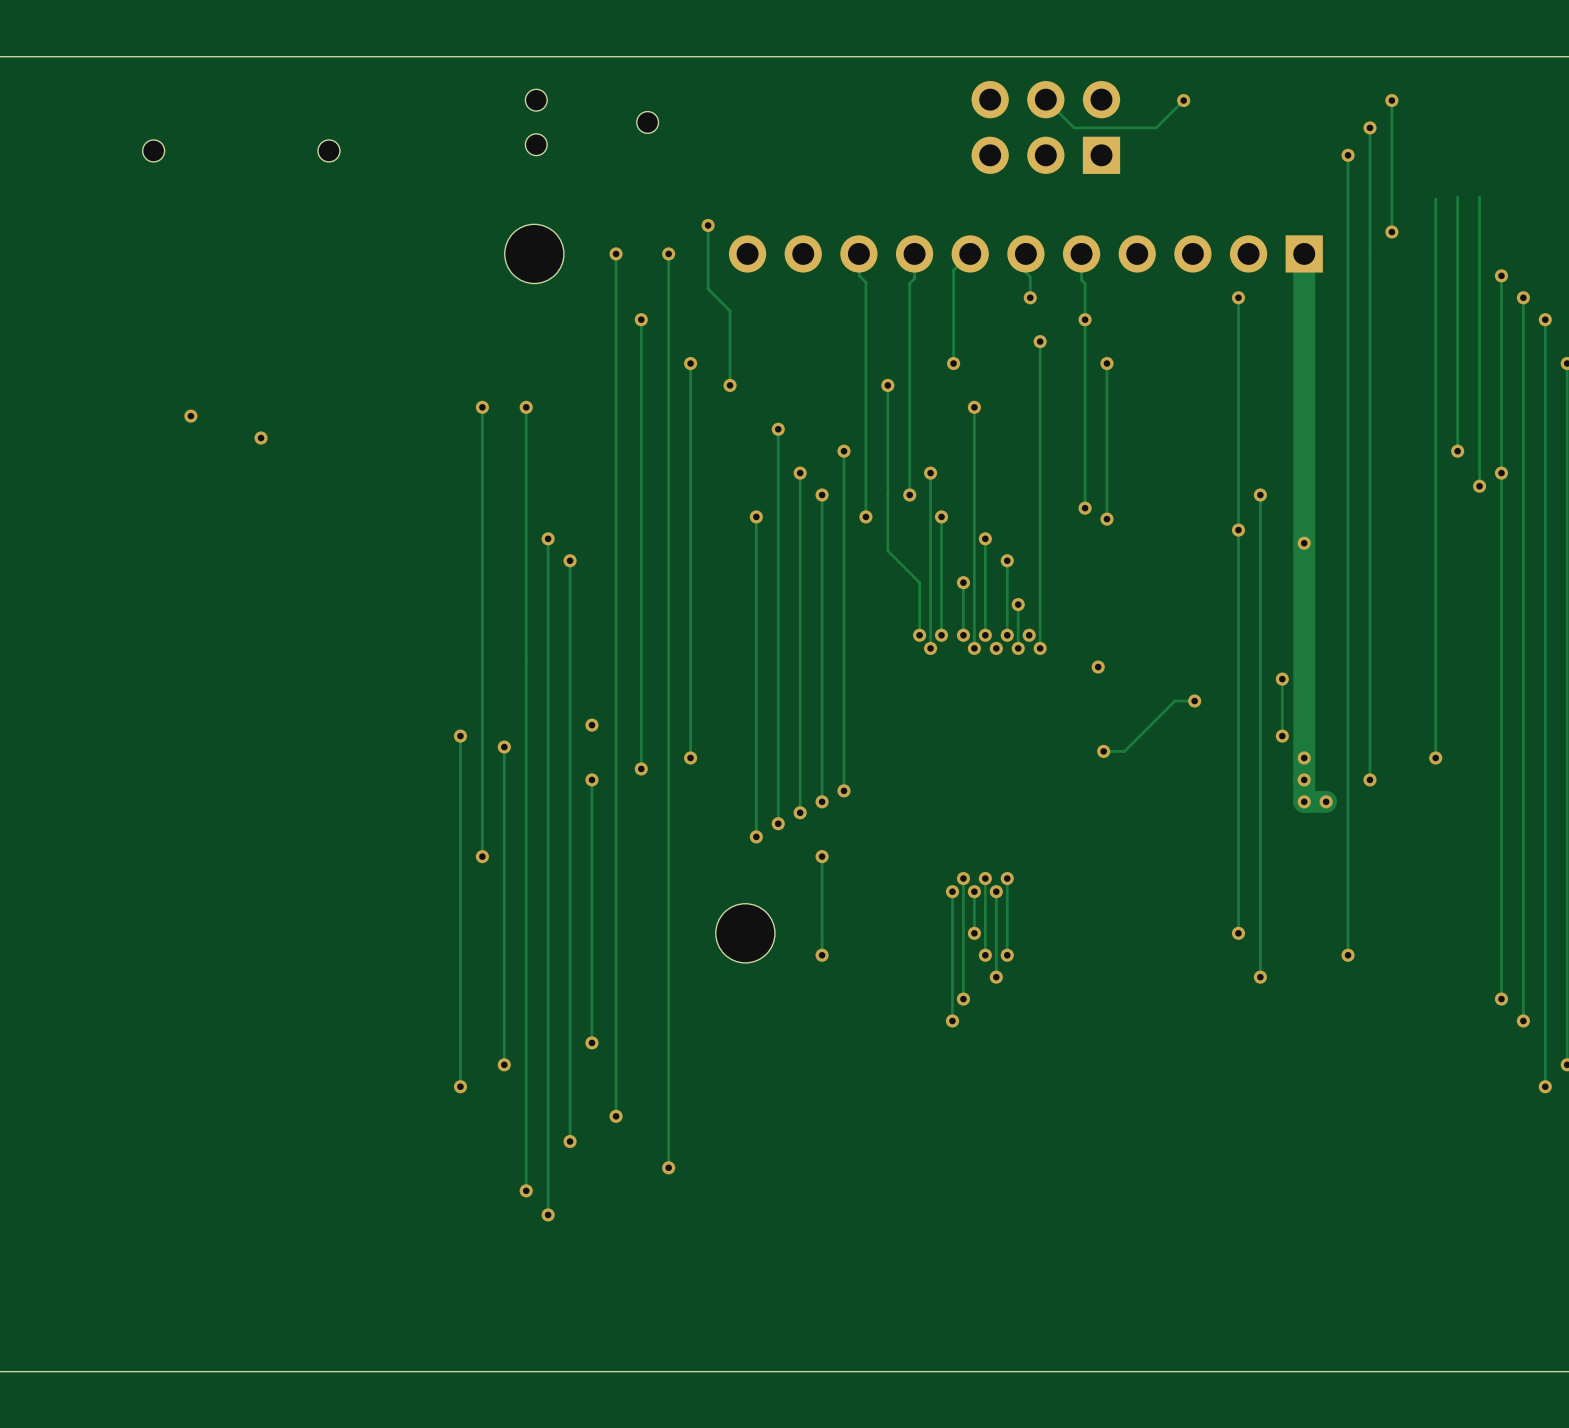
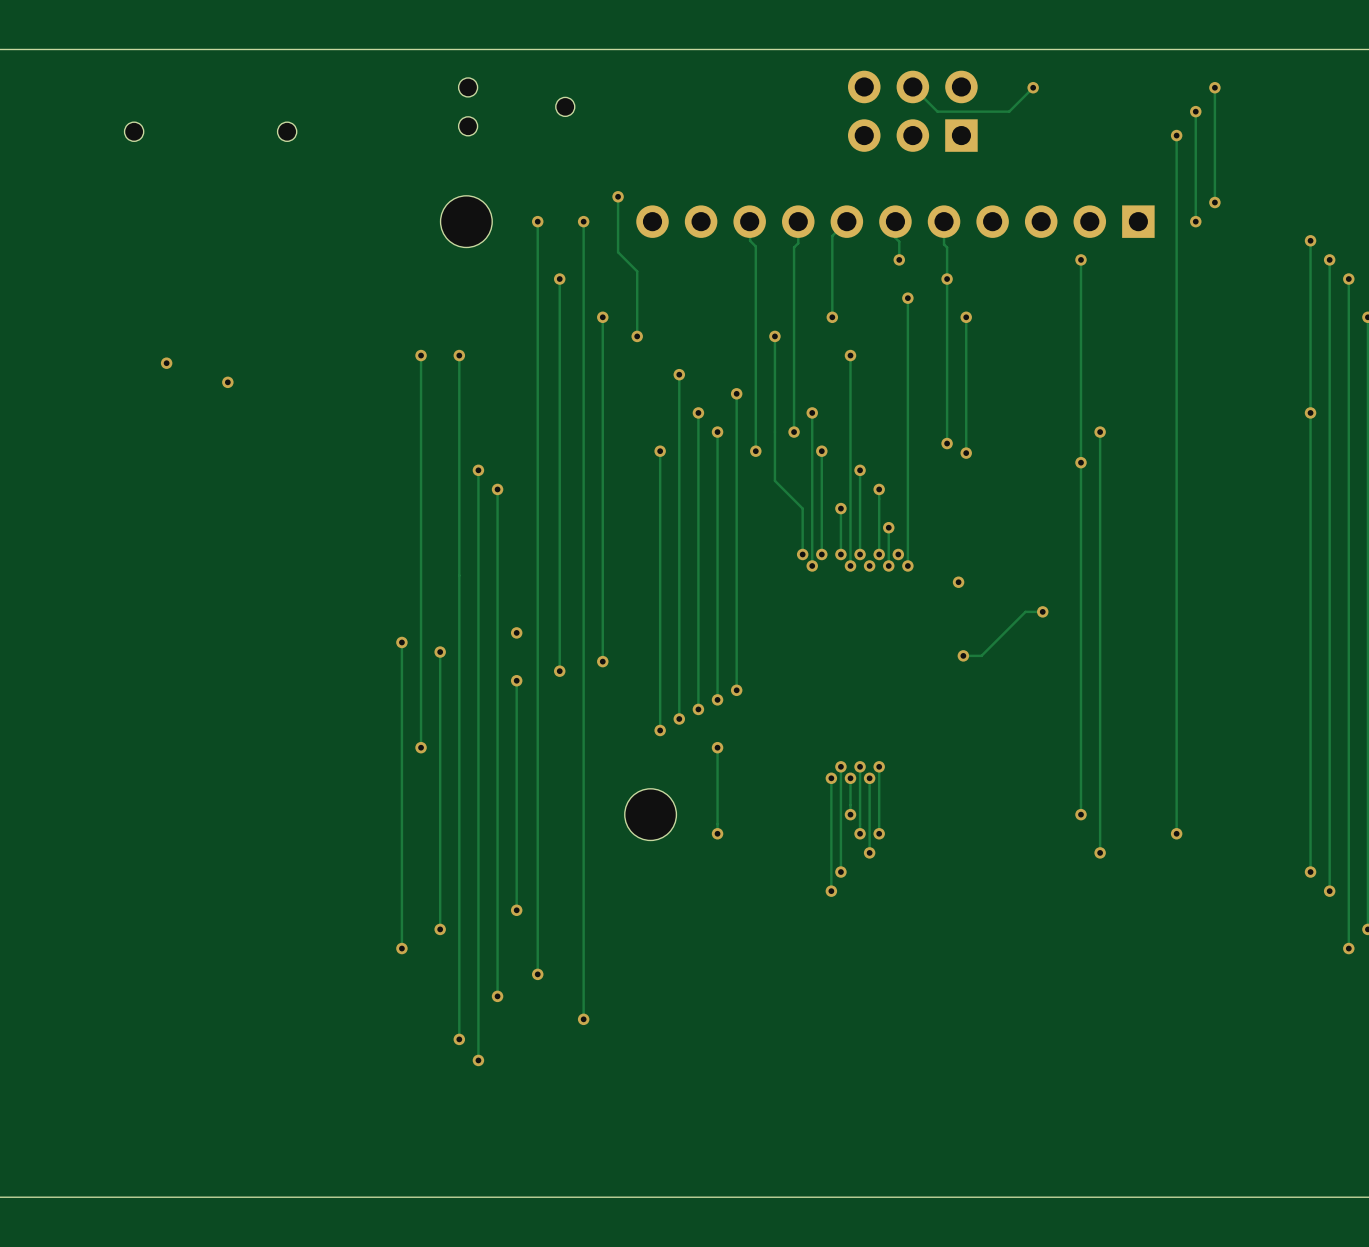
track: (1457, 196) (1457, 451) -> none
track: (1479, 196) (1479, 486) -> none
track: (1435, 199) (1435, 758) -> none
track: (1304, 253) (1304, 801) (1326, 801) -> none
track: (1369, 253) (1369, 779) -> none
via: none -> (1195, 221)
via: (1457, 451) -> none
via: (1479, 486) -> none
via: (1304, 543) -> none
track: (1282, 679) (1282, 736) -> none
via: (1282, 679) -> none
via: (1282, 736) -> none
via: (1304, 758) -> none
via: (1435, 758) -> none
via: (1304, 779) -> none
via: (1369, 779) -> none
via: (1304, 801) -> none
via: (1326, 801) -> none

